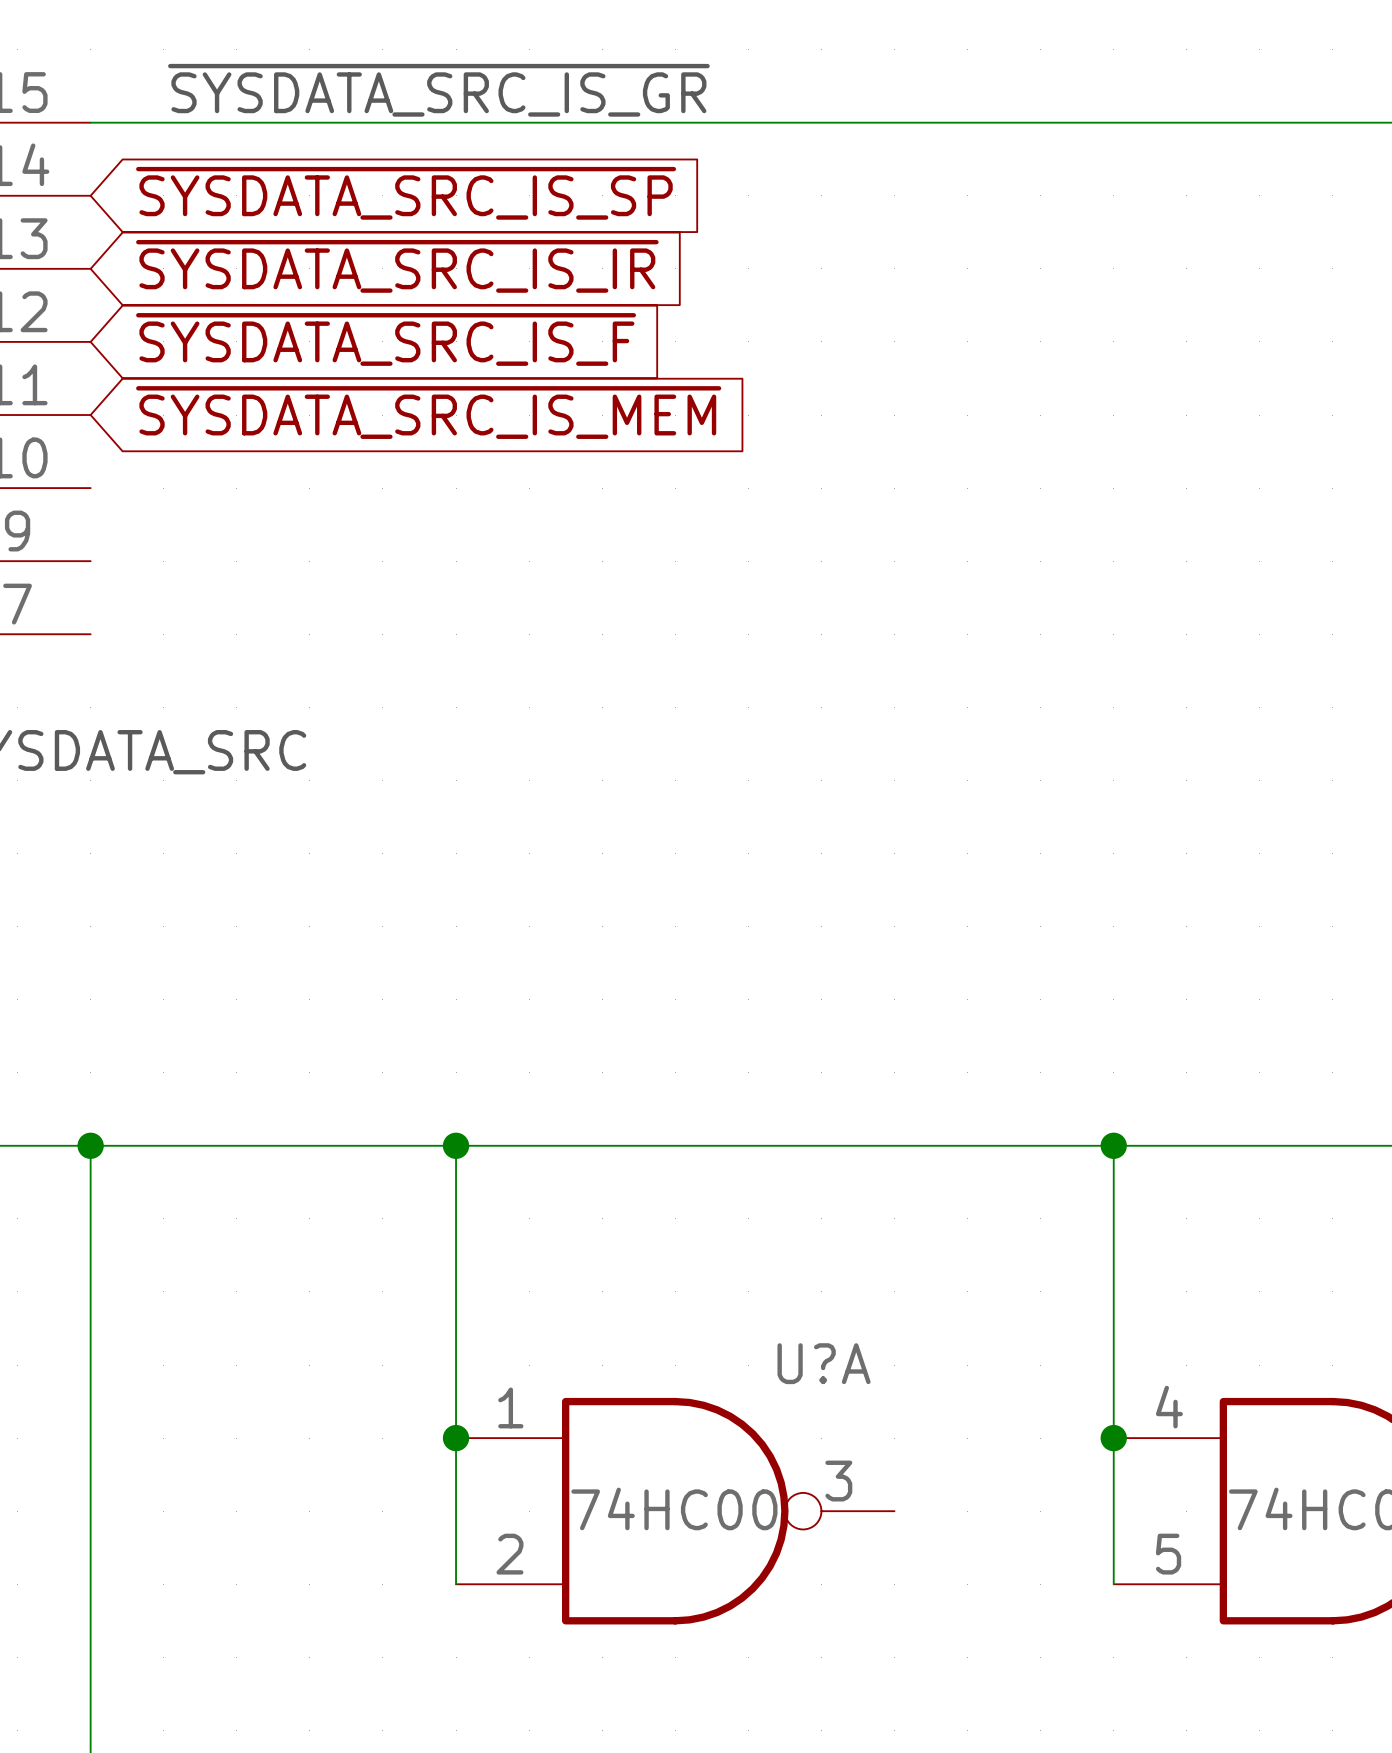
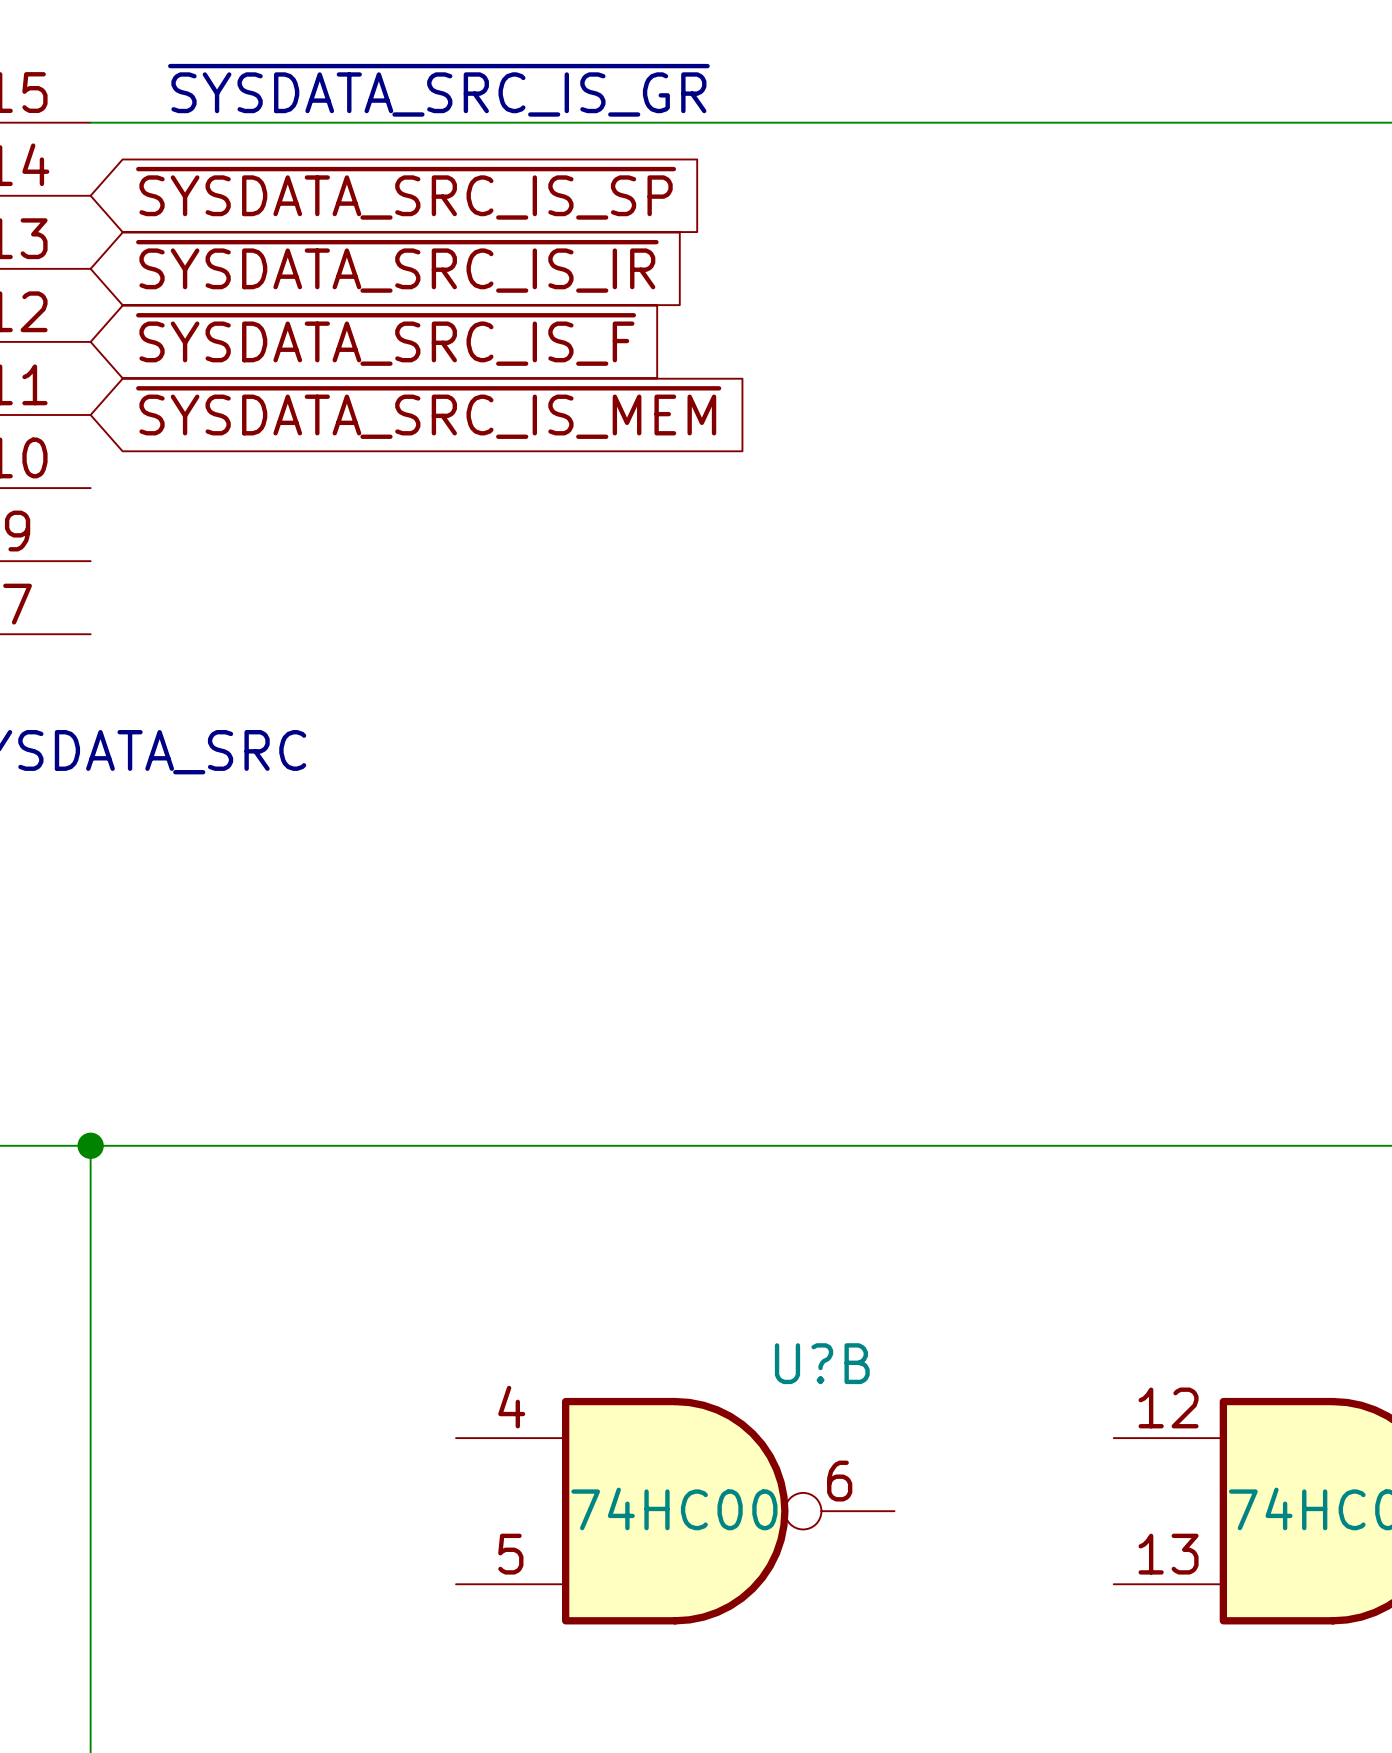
wire: (456, 1145) (456, 1584) -> none
junction: (456, 1145) -> none
wire: (1113, 1145) (1113, 1584) -> none
junction: (1113, 1145) -> none
U?A name: U?A (824, 1363) -> U?B (822, 1363)
U?A pin number: 1 (510, 1407) -> 4 (511, 1407)
part pin number: 4 (1169, 1407) -> 12 (1168, 1407)
junction: (456, 1438) -> none
junction: (1113, 1438) -> none
U?A pin number: 3 (838, 1481) -> 6 (839, 1481)
U?A pin number: 2 (509, 1554) -> 5 (510, 1554)
part pin number: 5 (1168, 1554) -> 13 (1168, 1554)

